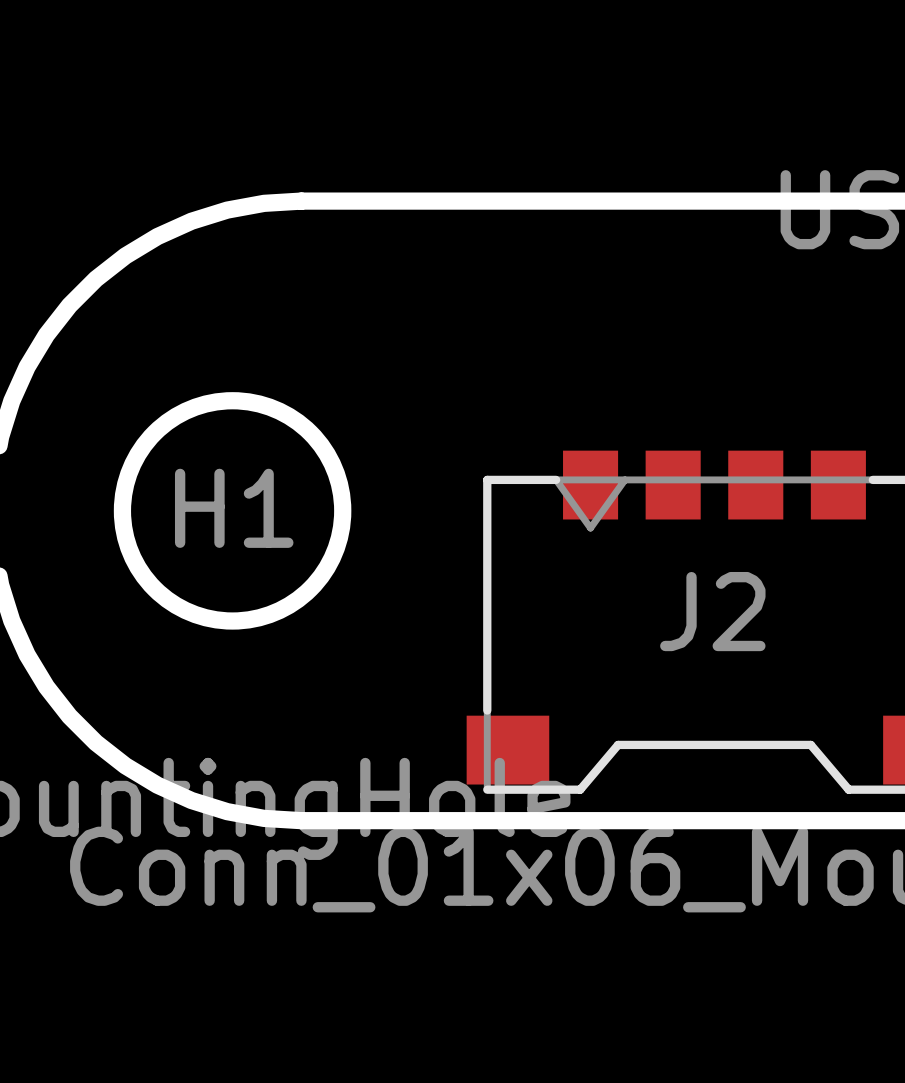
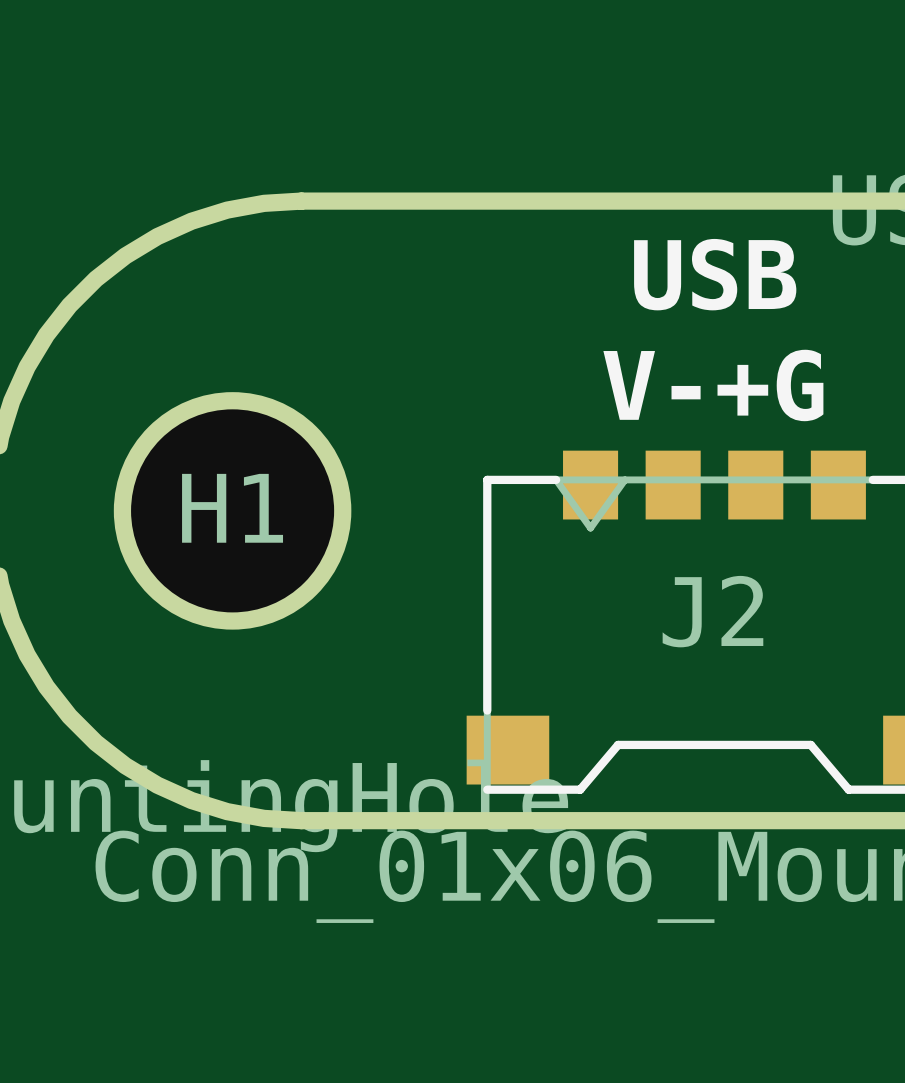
text: none -> USB (715, 274)
text: none -> V-+G (713, 385)

